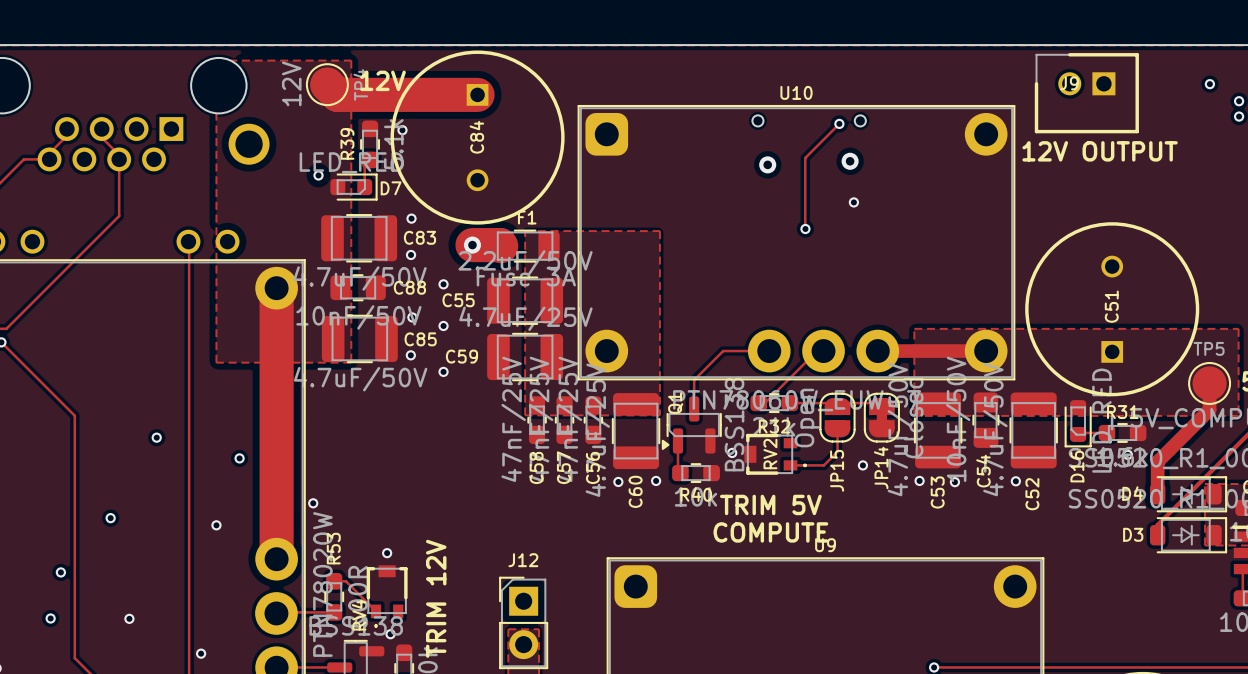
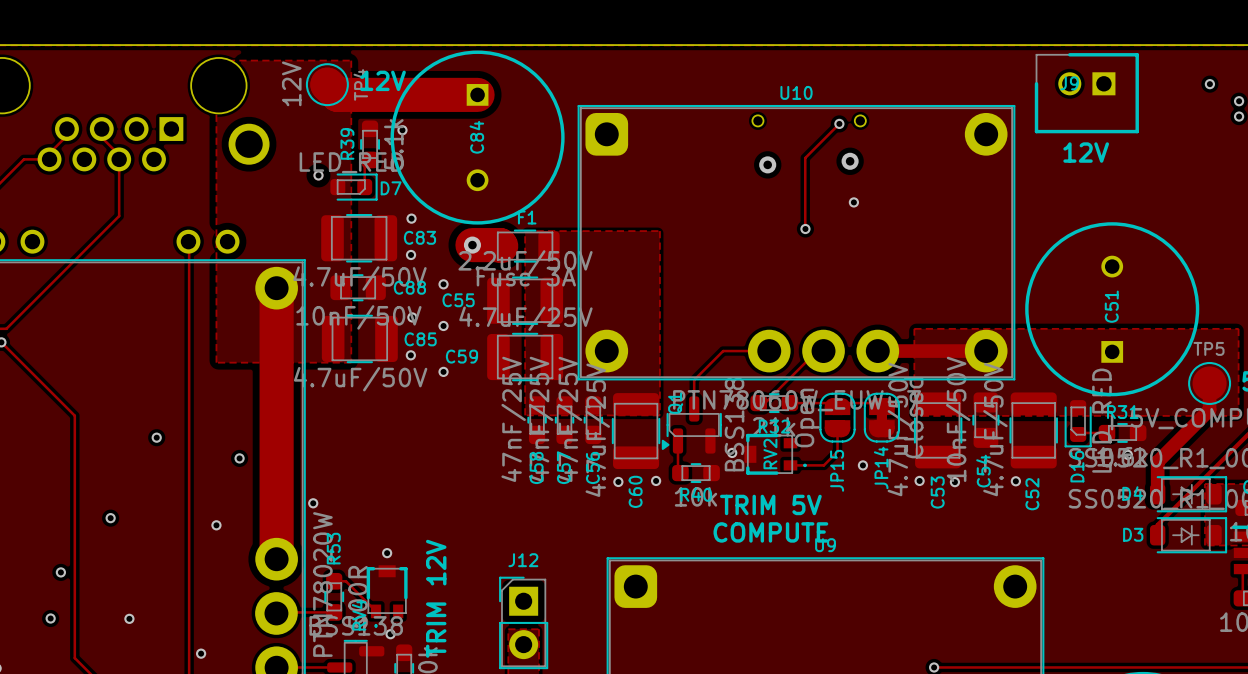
text: 12V OUTPUT (1100, 151) -> none
text: none -> 12V (1086, 152)

